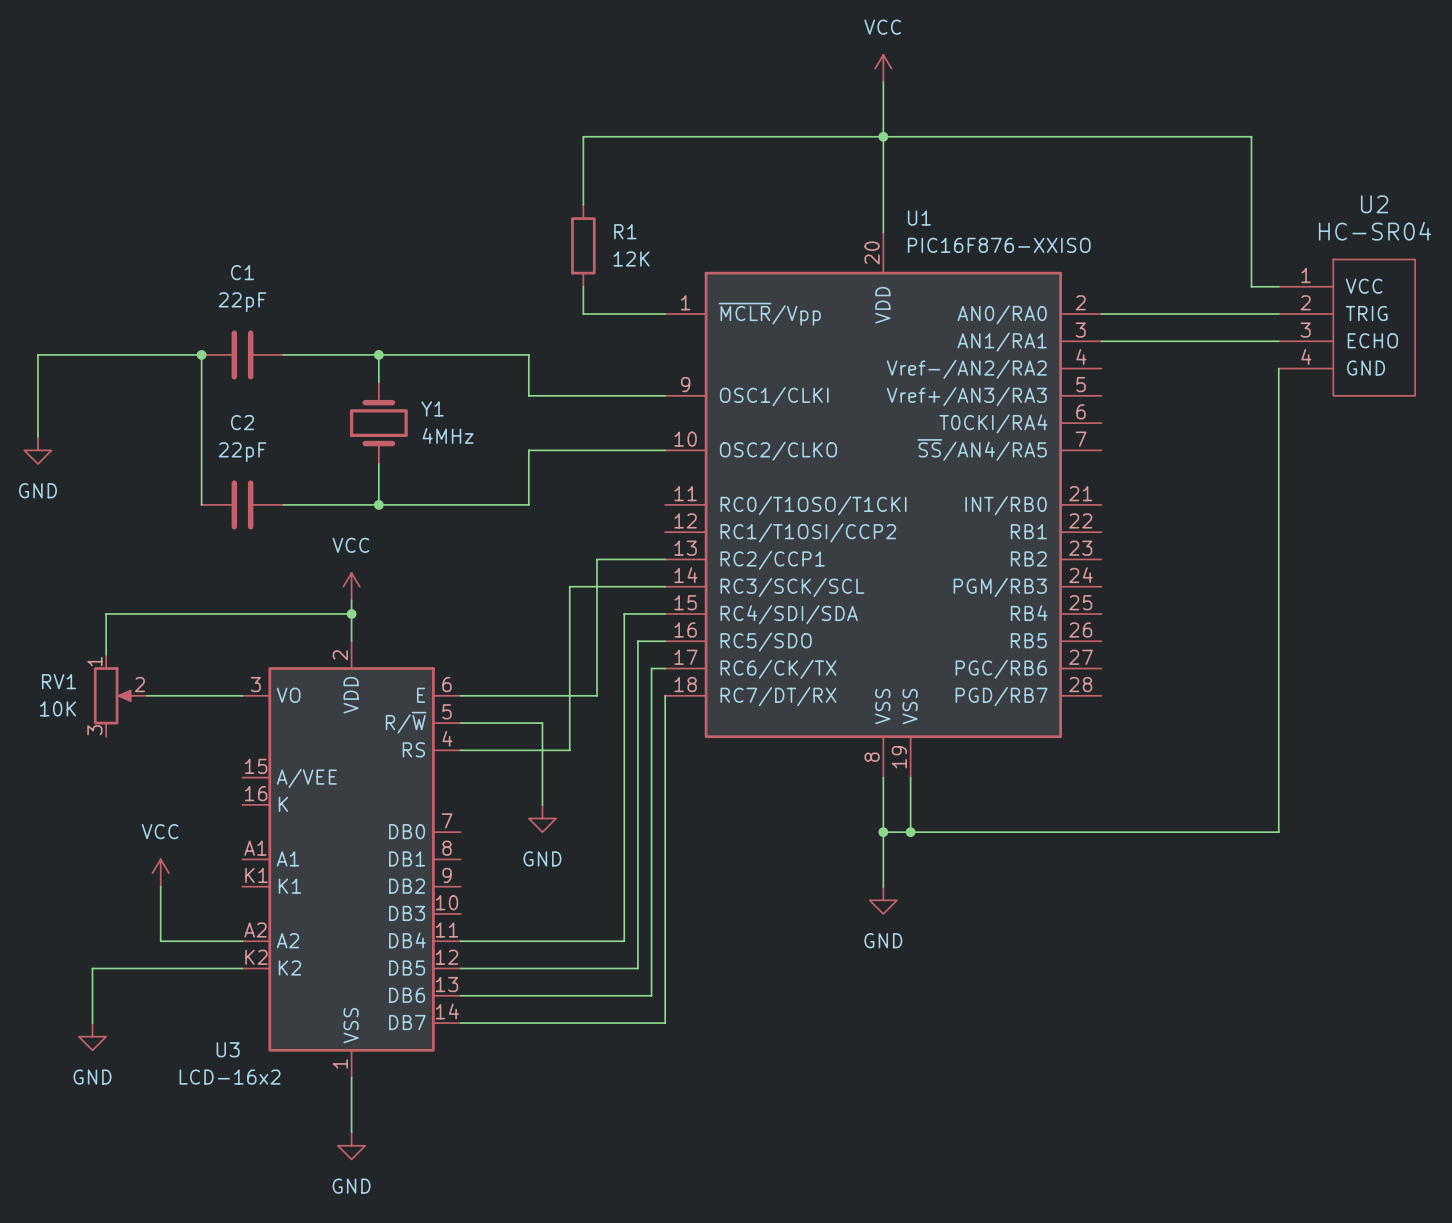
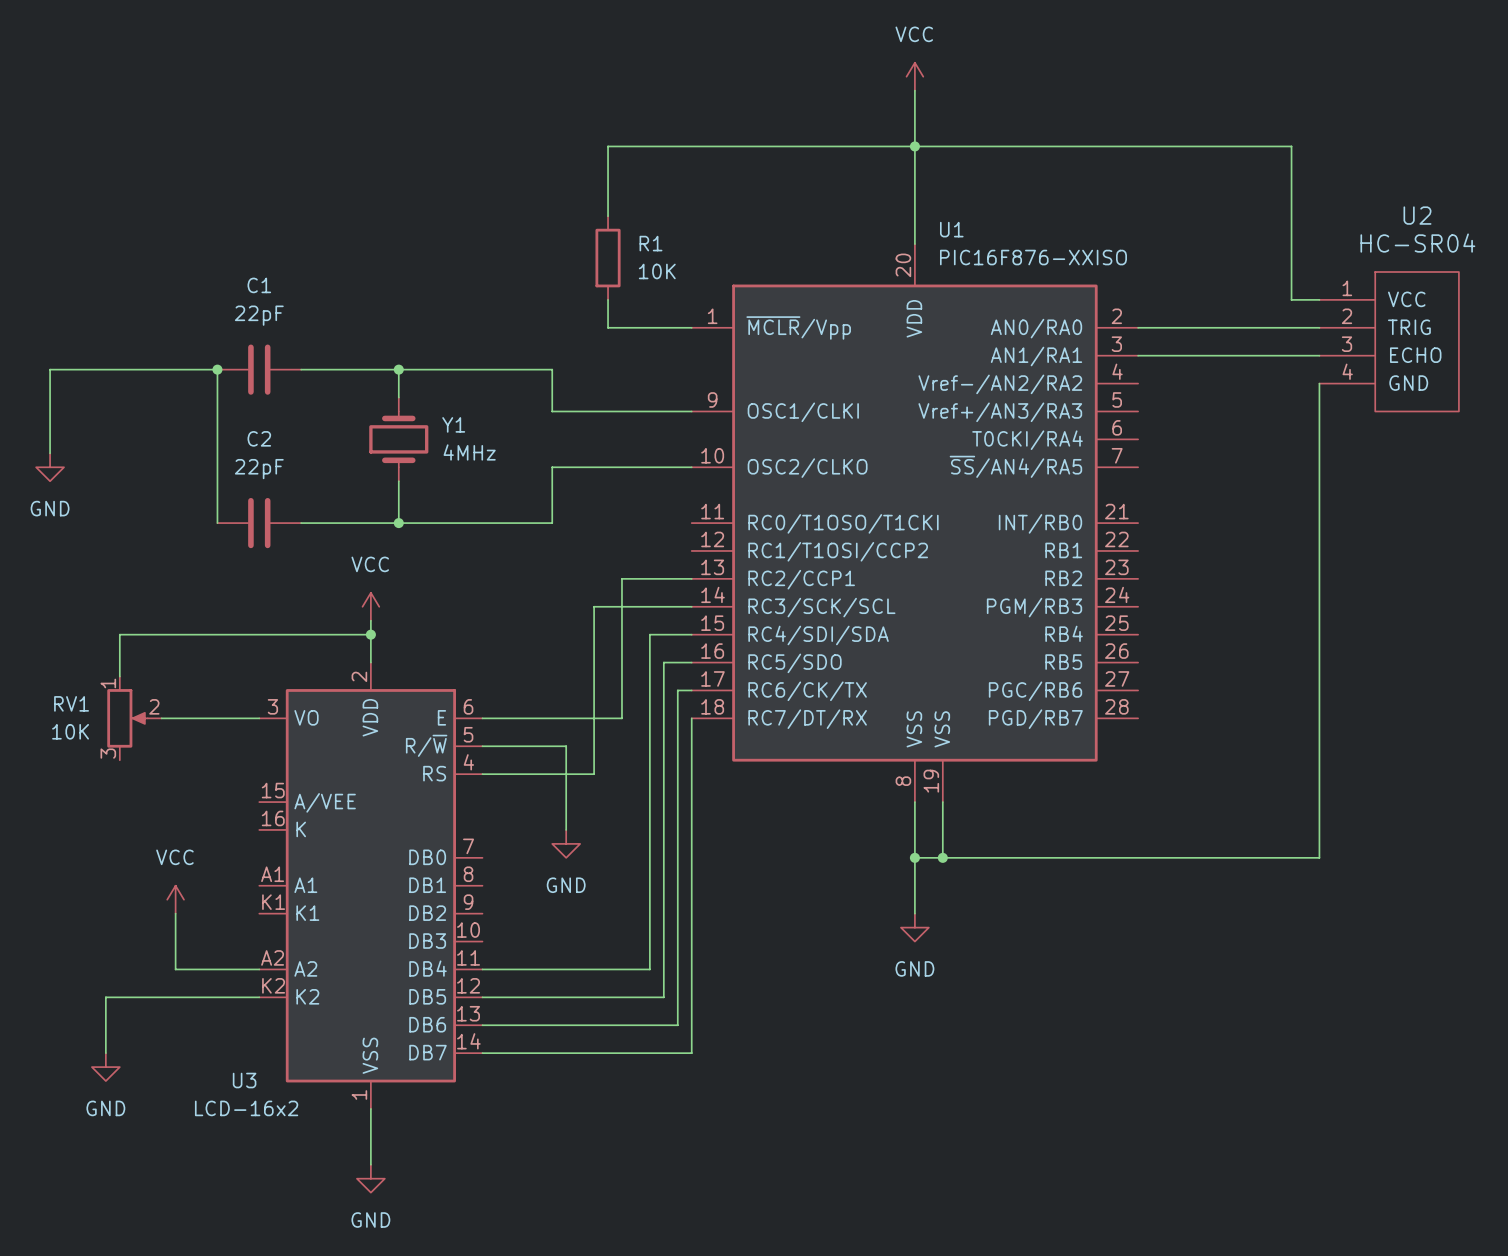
R1 value: 12K (631, 258) -> 10K (657, 271)

